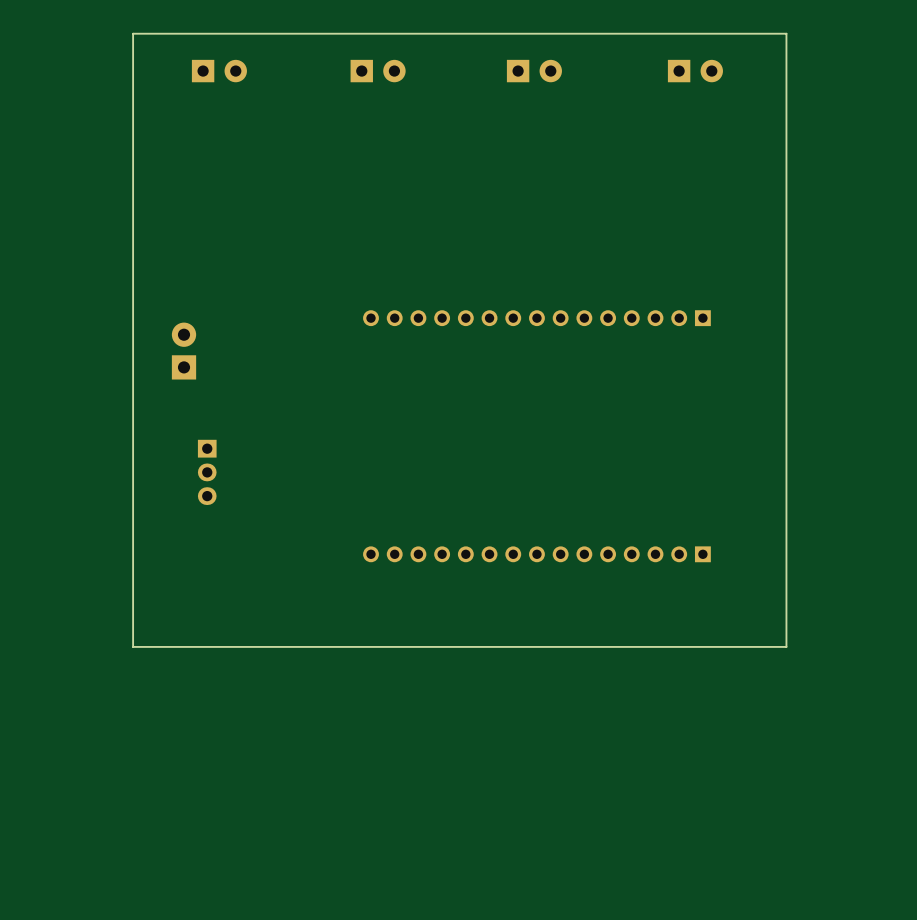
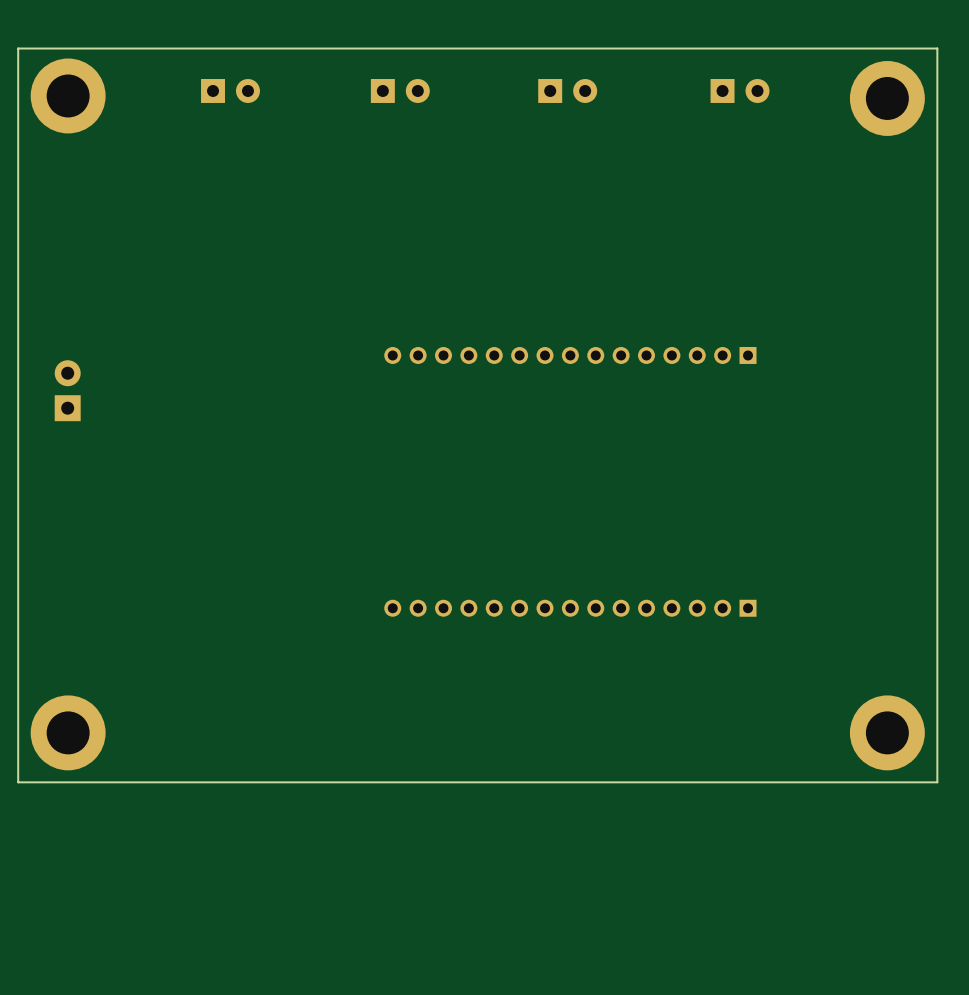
board edge: (786, 33) (133, 33) (133, 646) (786, 646) (786, 33) -> (937, 48) (937, 782) (18, 782) (18, 48) (937, 48)
part: none -> (68, 95)
part: none -> (887, 98)
part position: (184, 351) -> (67, 390)
part: (207, 472) -> none
part: none -> (68, 732)
part: none -> (887, 732)

